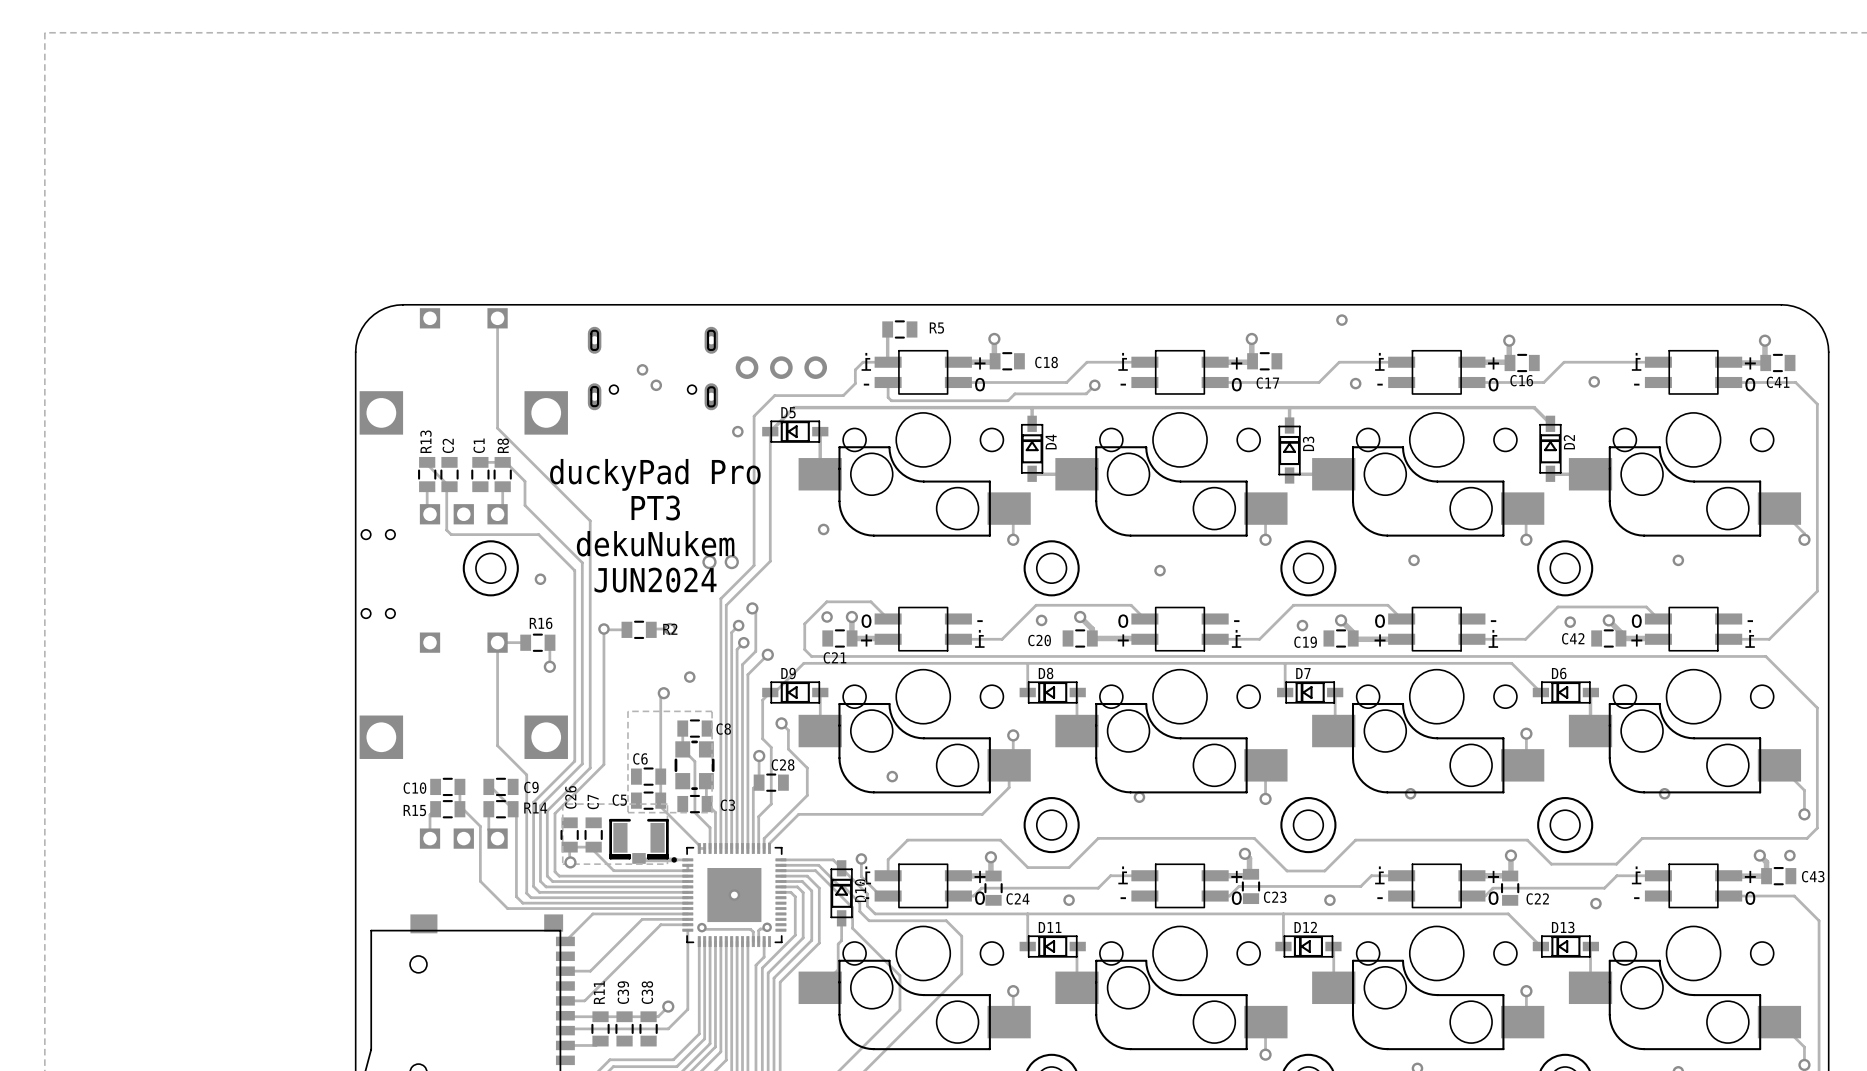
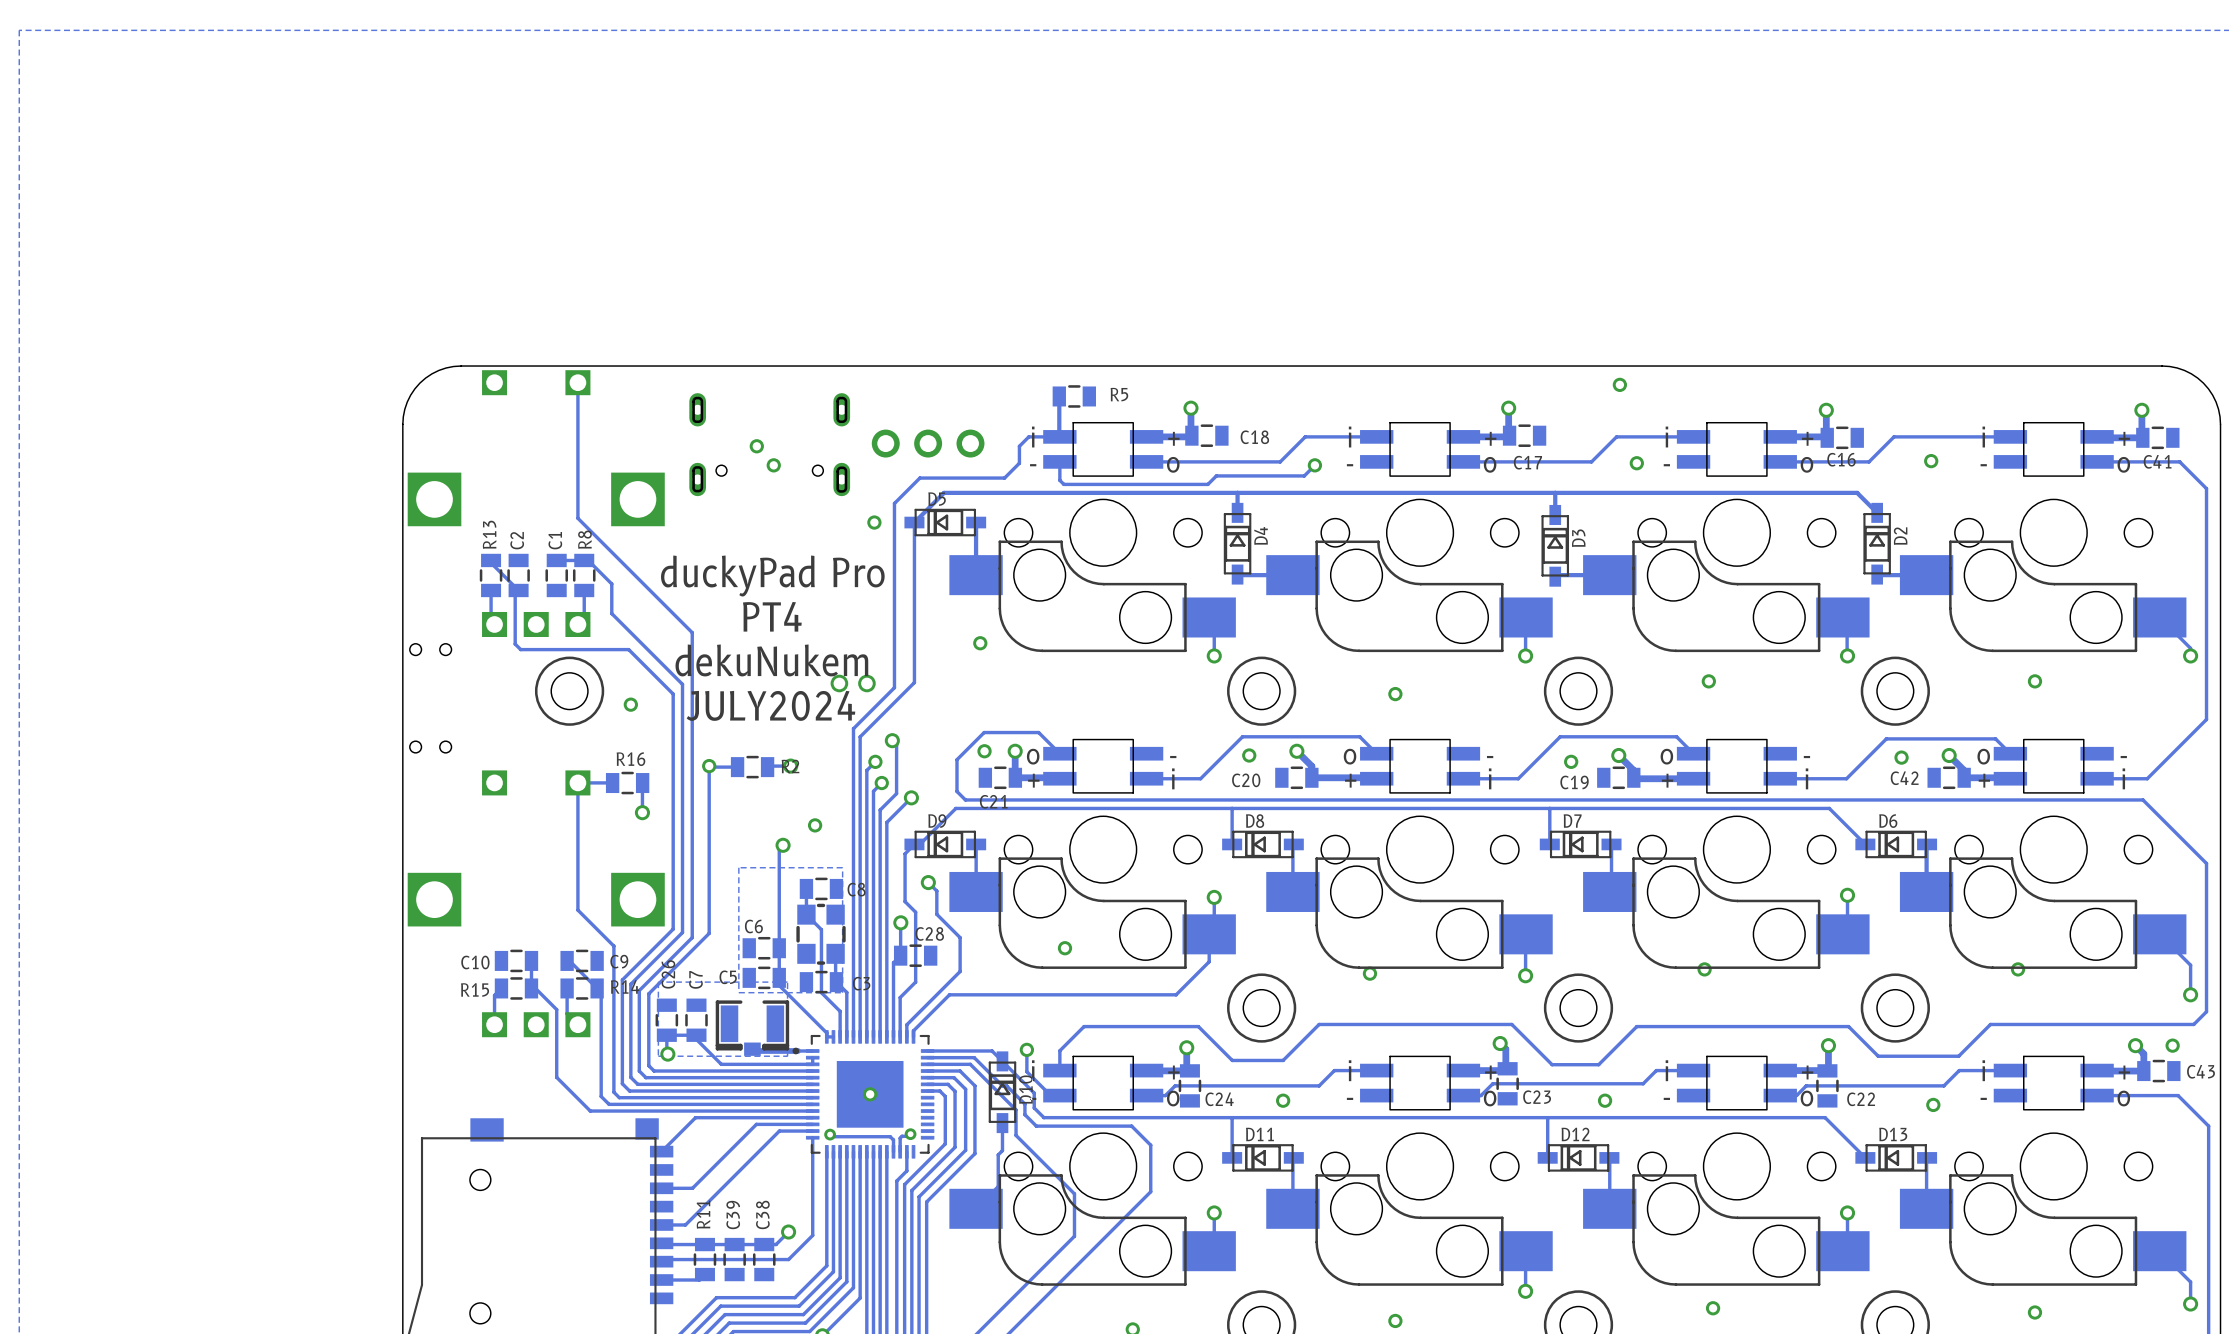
text: PT3 (655, 508) -> PT4 (772, 616)
text: JUN2024 (655, 580) -> JULY2024 (770, 705)

